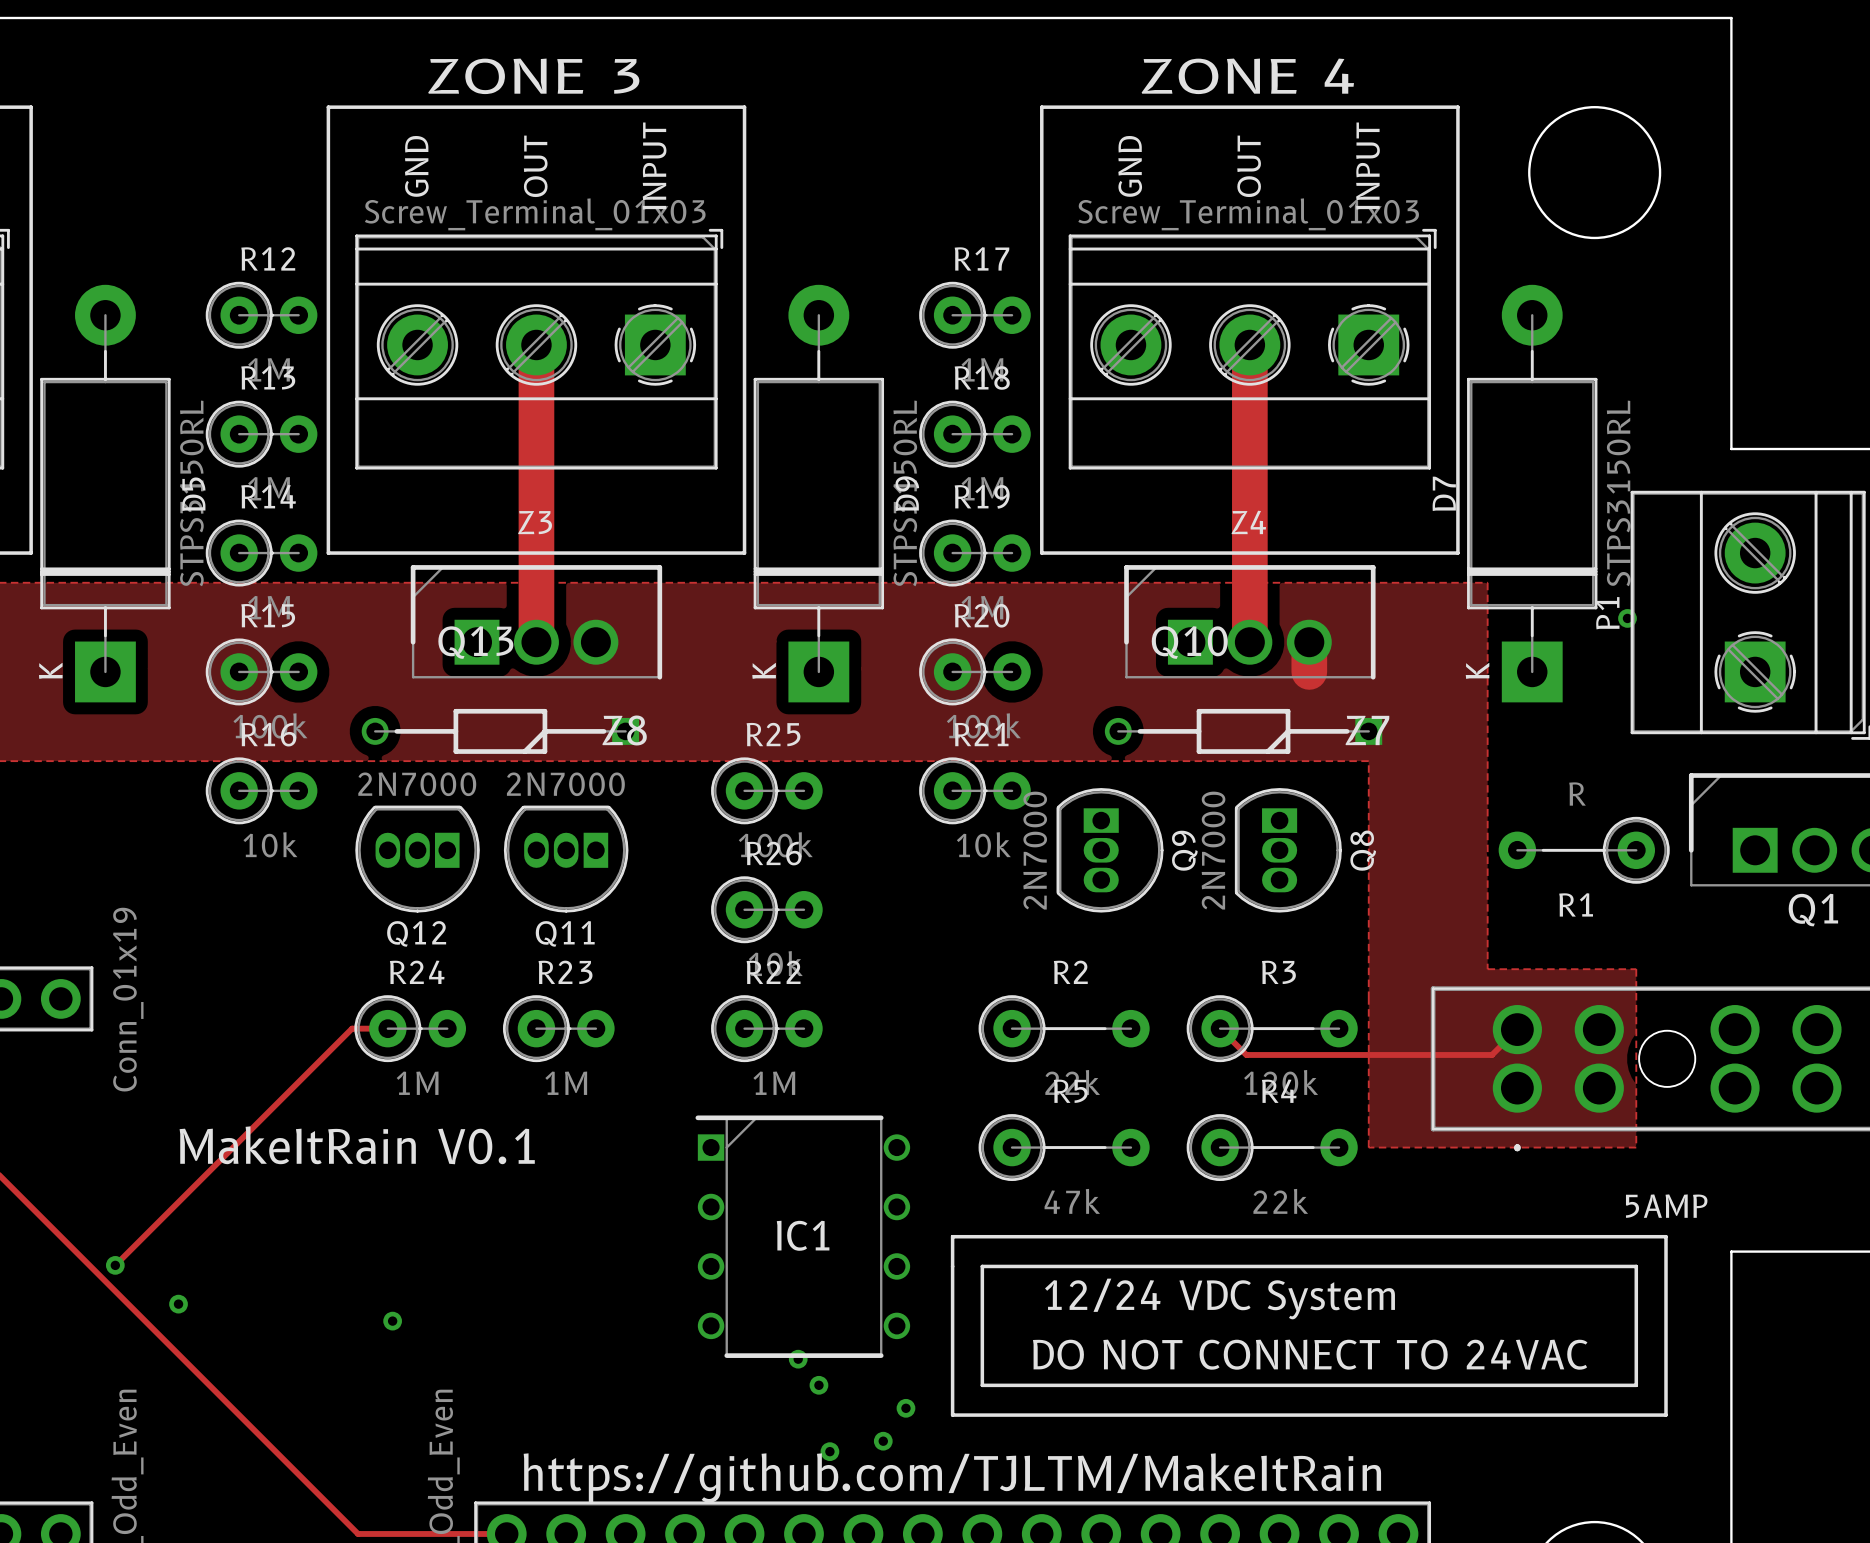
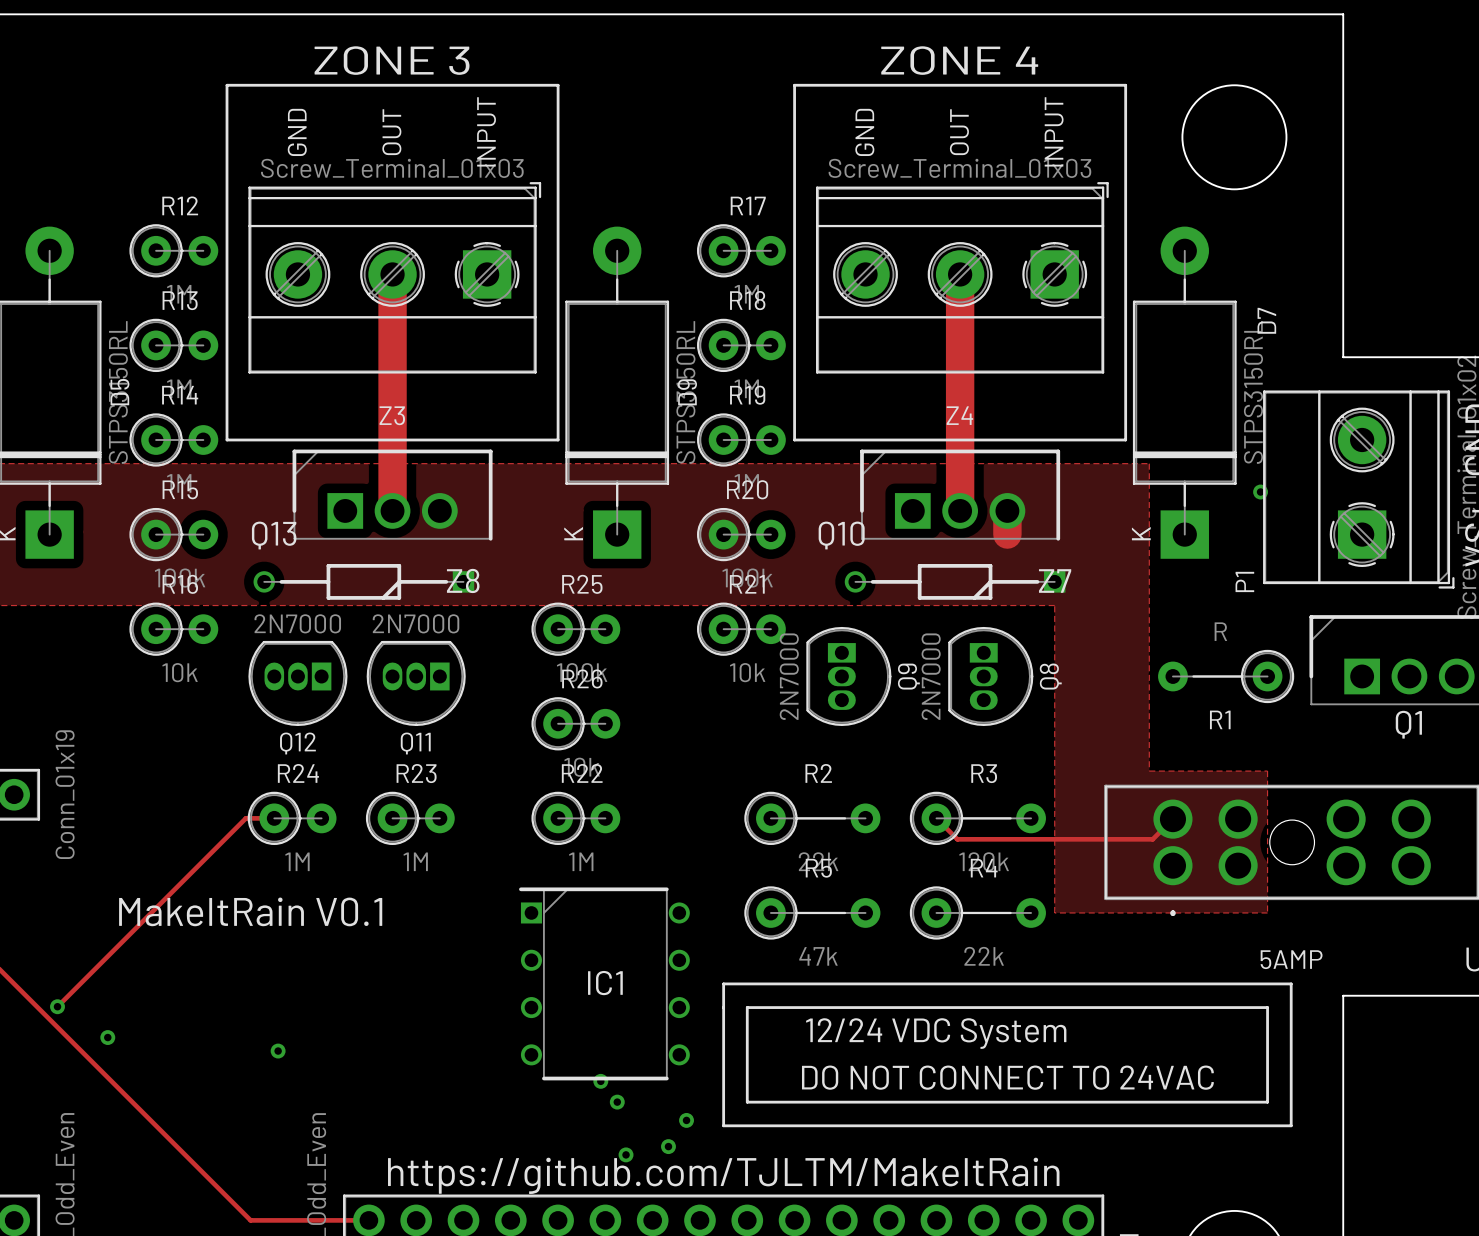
D7 name position: D7 (1444, 493) -> D7 (1266, 320)
P1 name position: P1 (1607, 613) -> P1 (1244, 581)
Q13 name position: Q13 (475, 642) -> Q13 (274, 535)
Q10 name position: Q10 (1189, 642) -> Q10 (841, 535)

